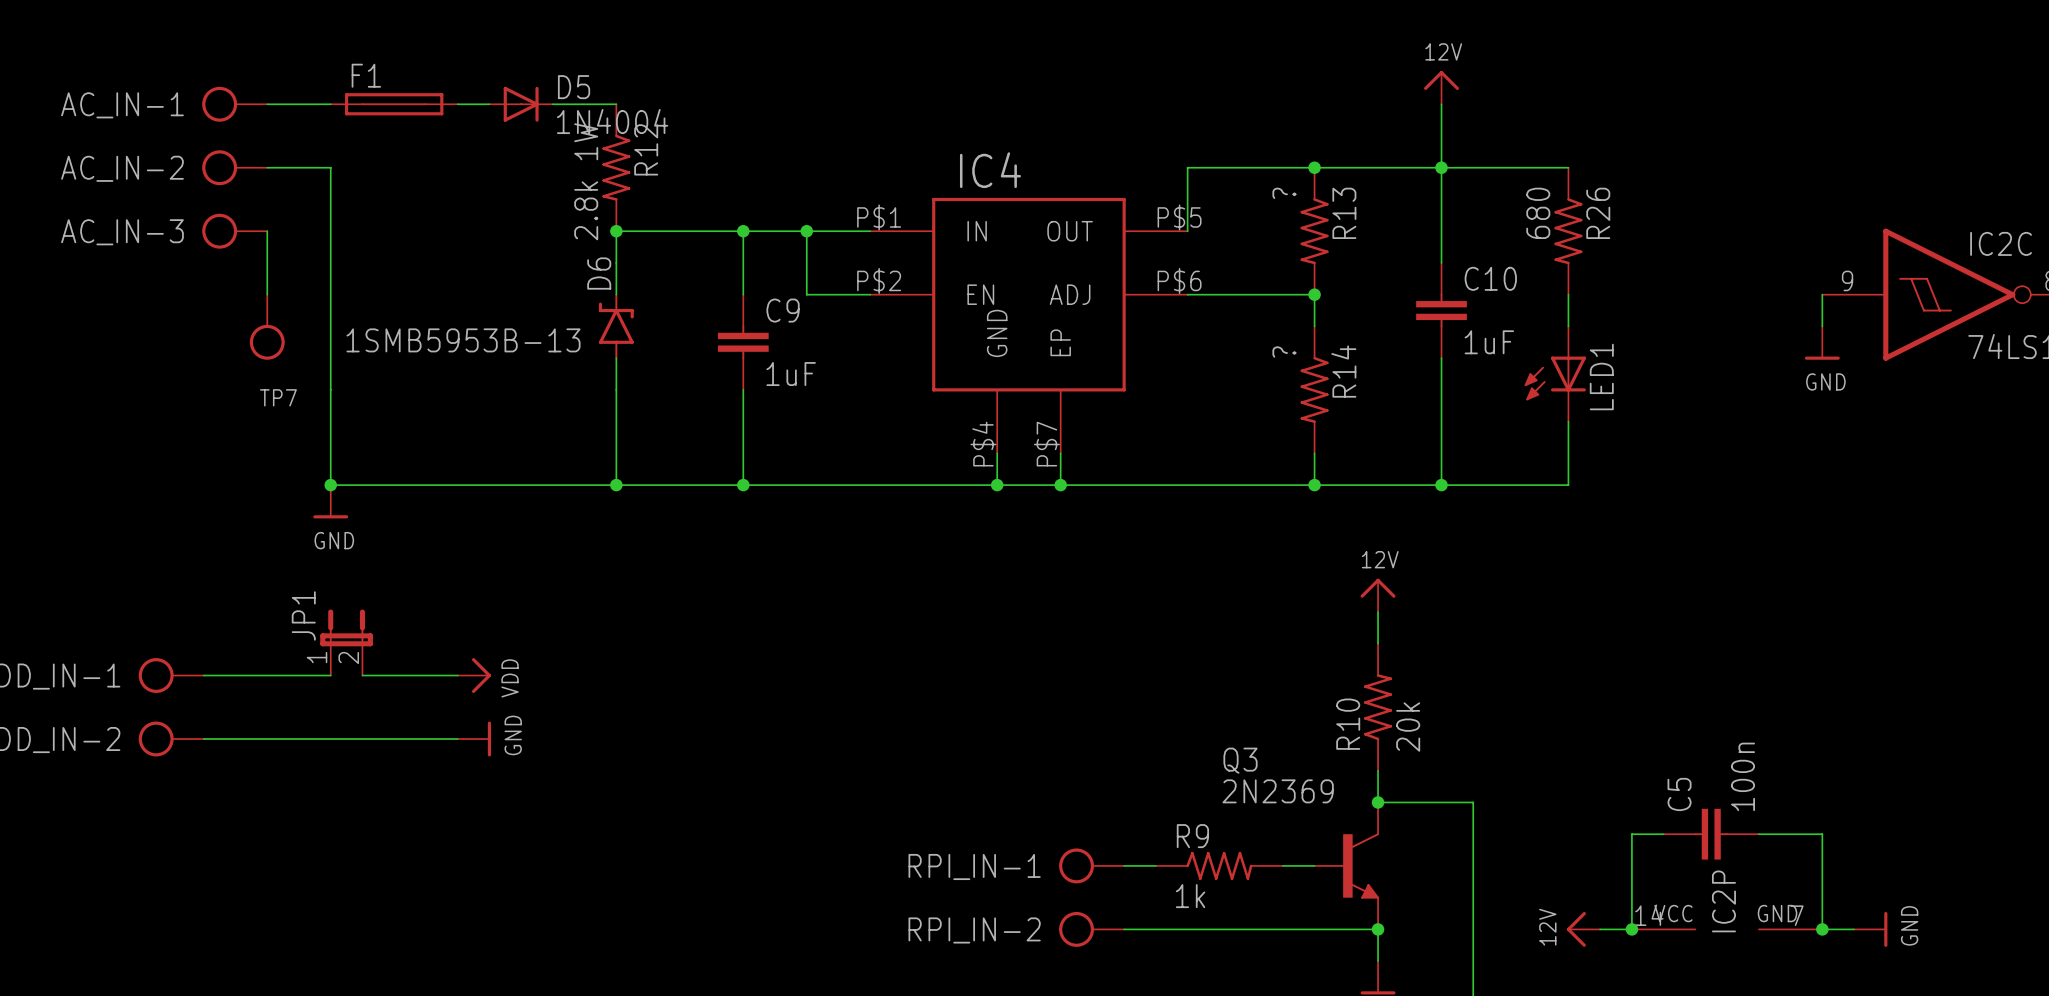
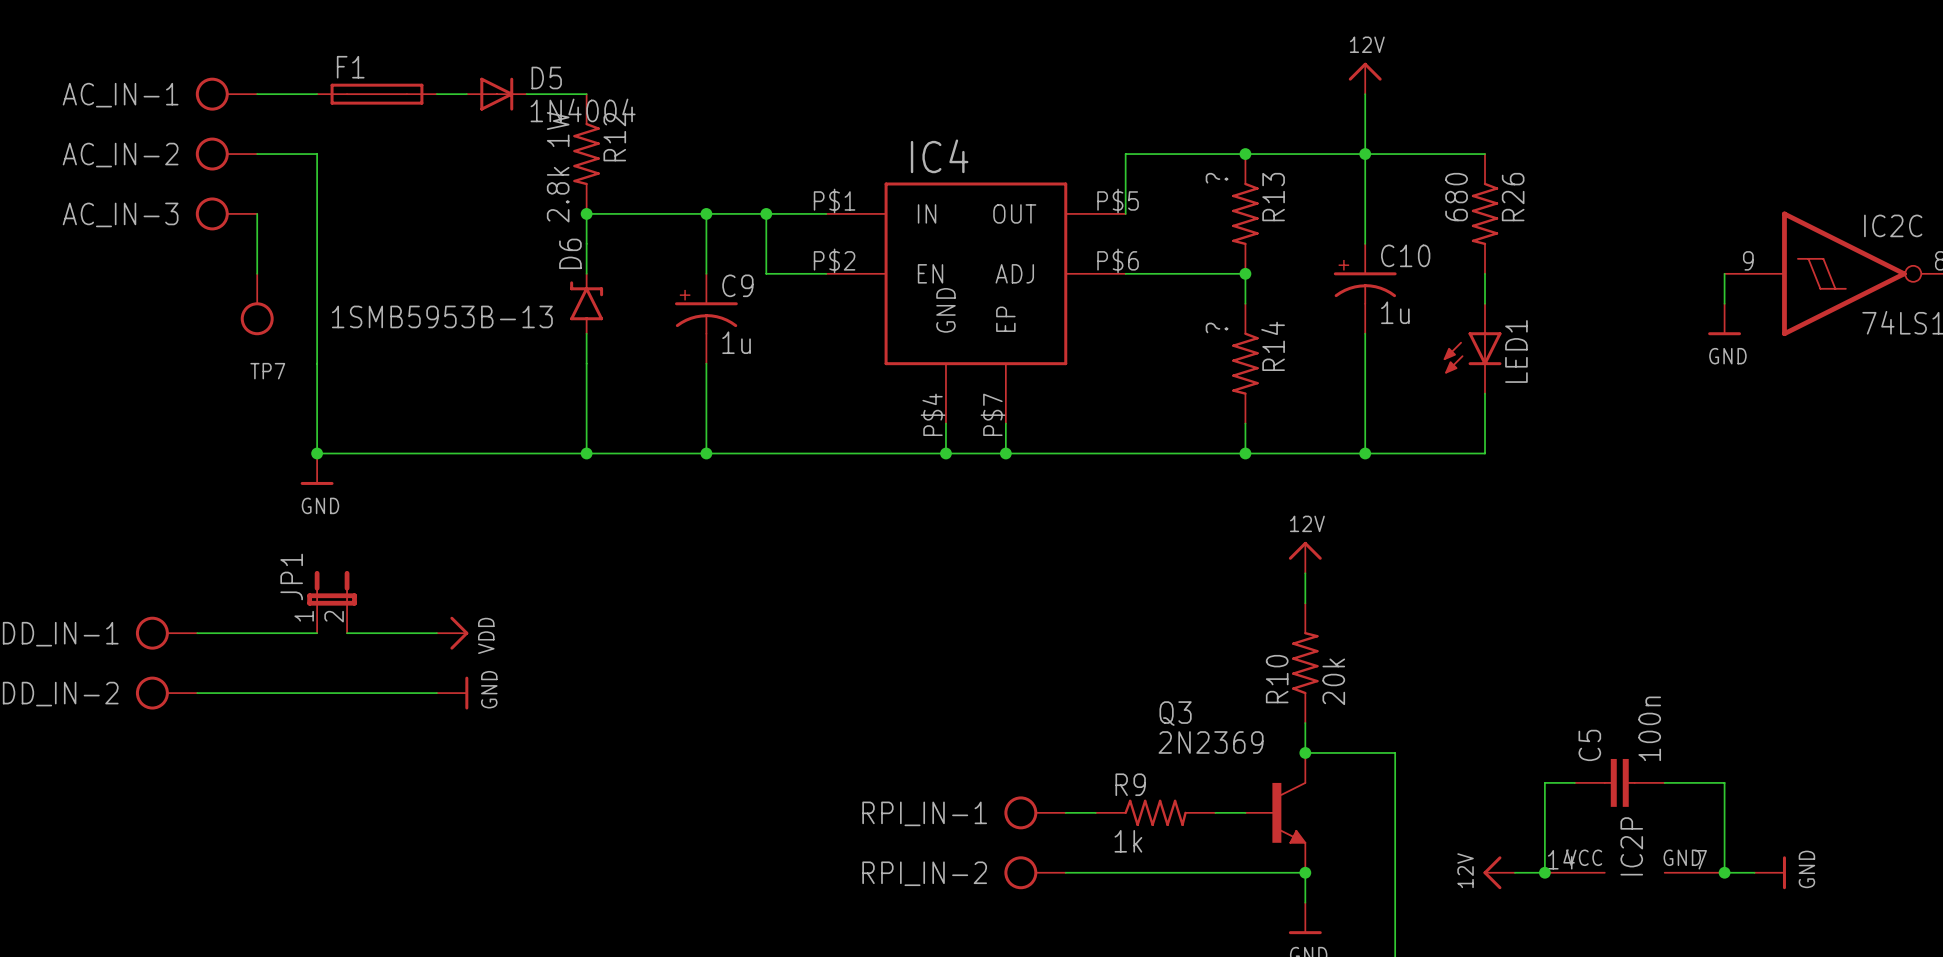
C10 symbol: [1416, 262, 1467, 359] -> [1333, 243, 1397, 334]
C9 symbol: [717, 294, 769, 390] -> [674, 273, 738, 364]
C10 value: 1uF (1489, 342) -> 1u (1395, 312)
C9 value: 1uF (791, 374) -> 1u (736, 342)

